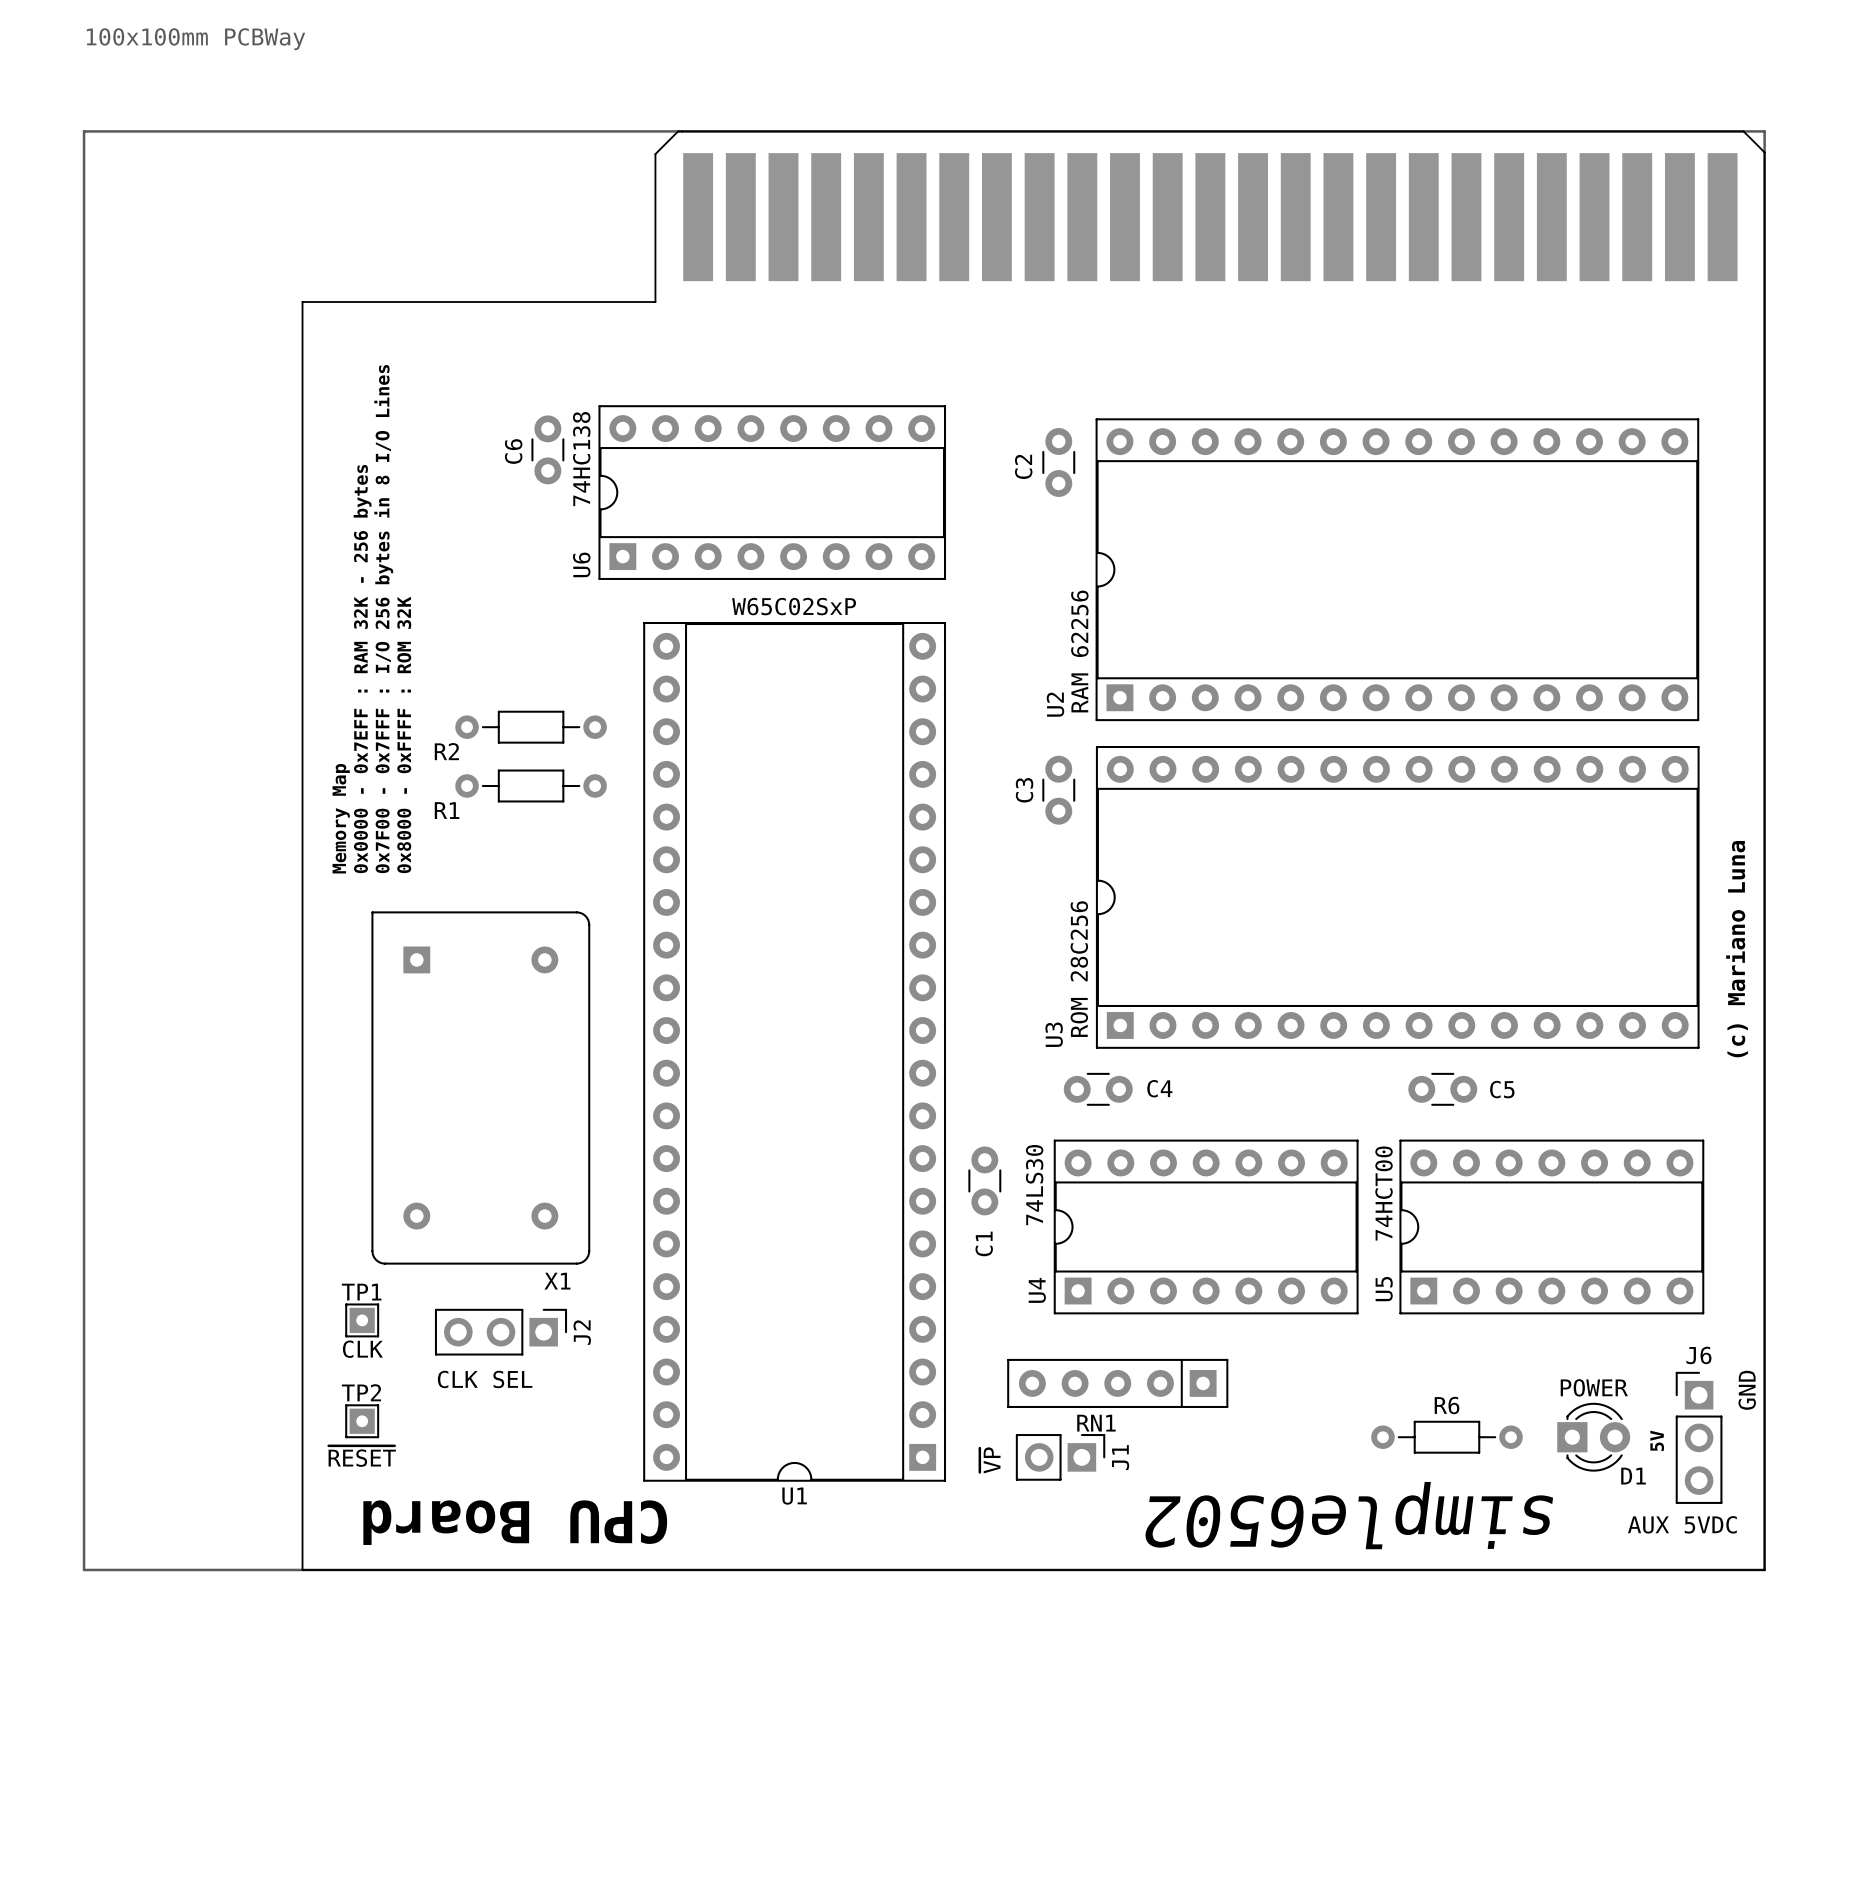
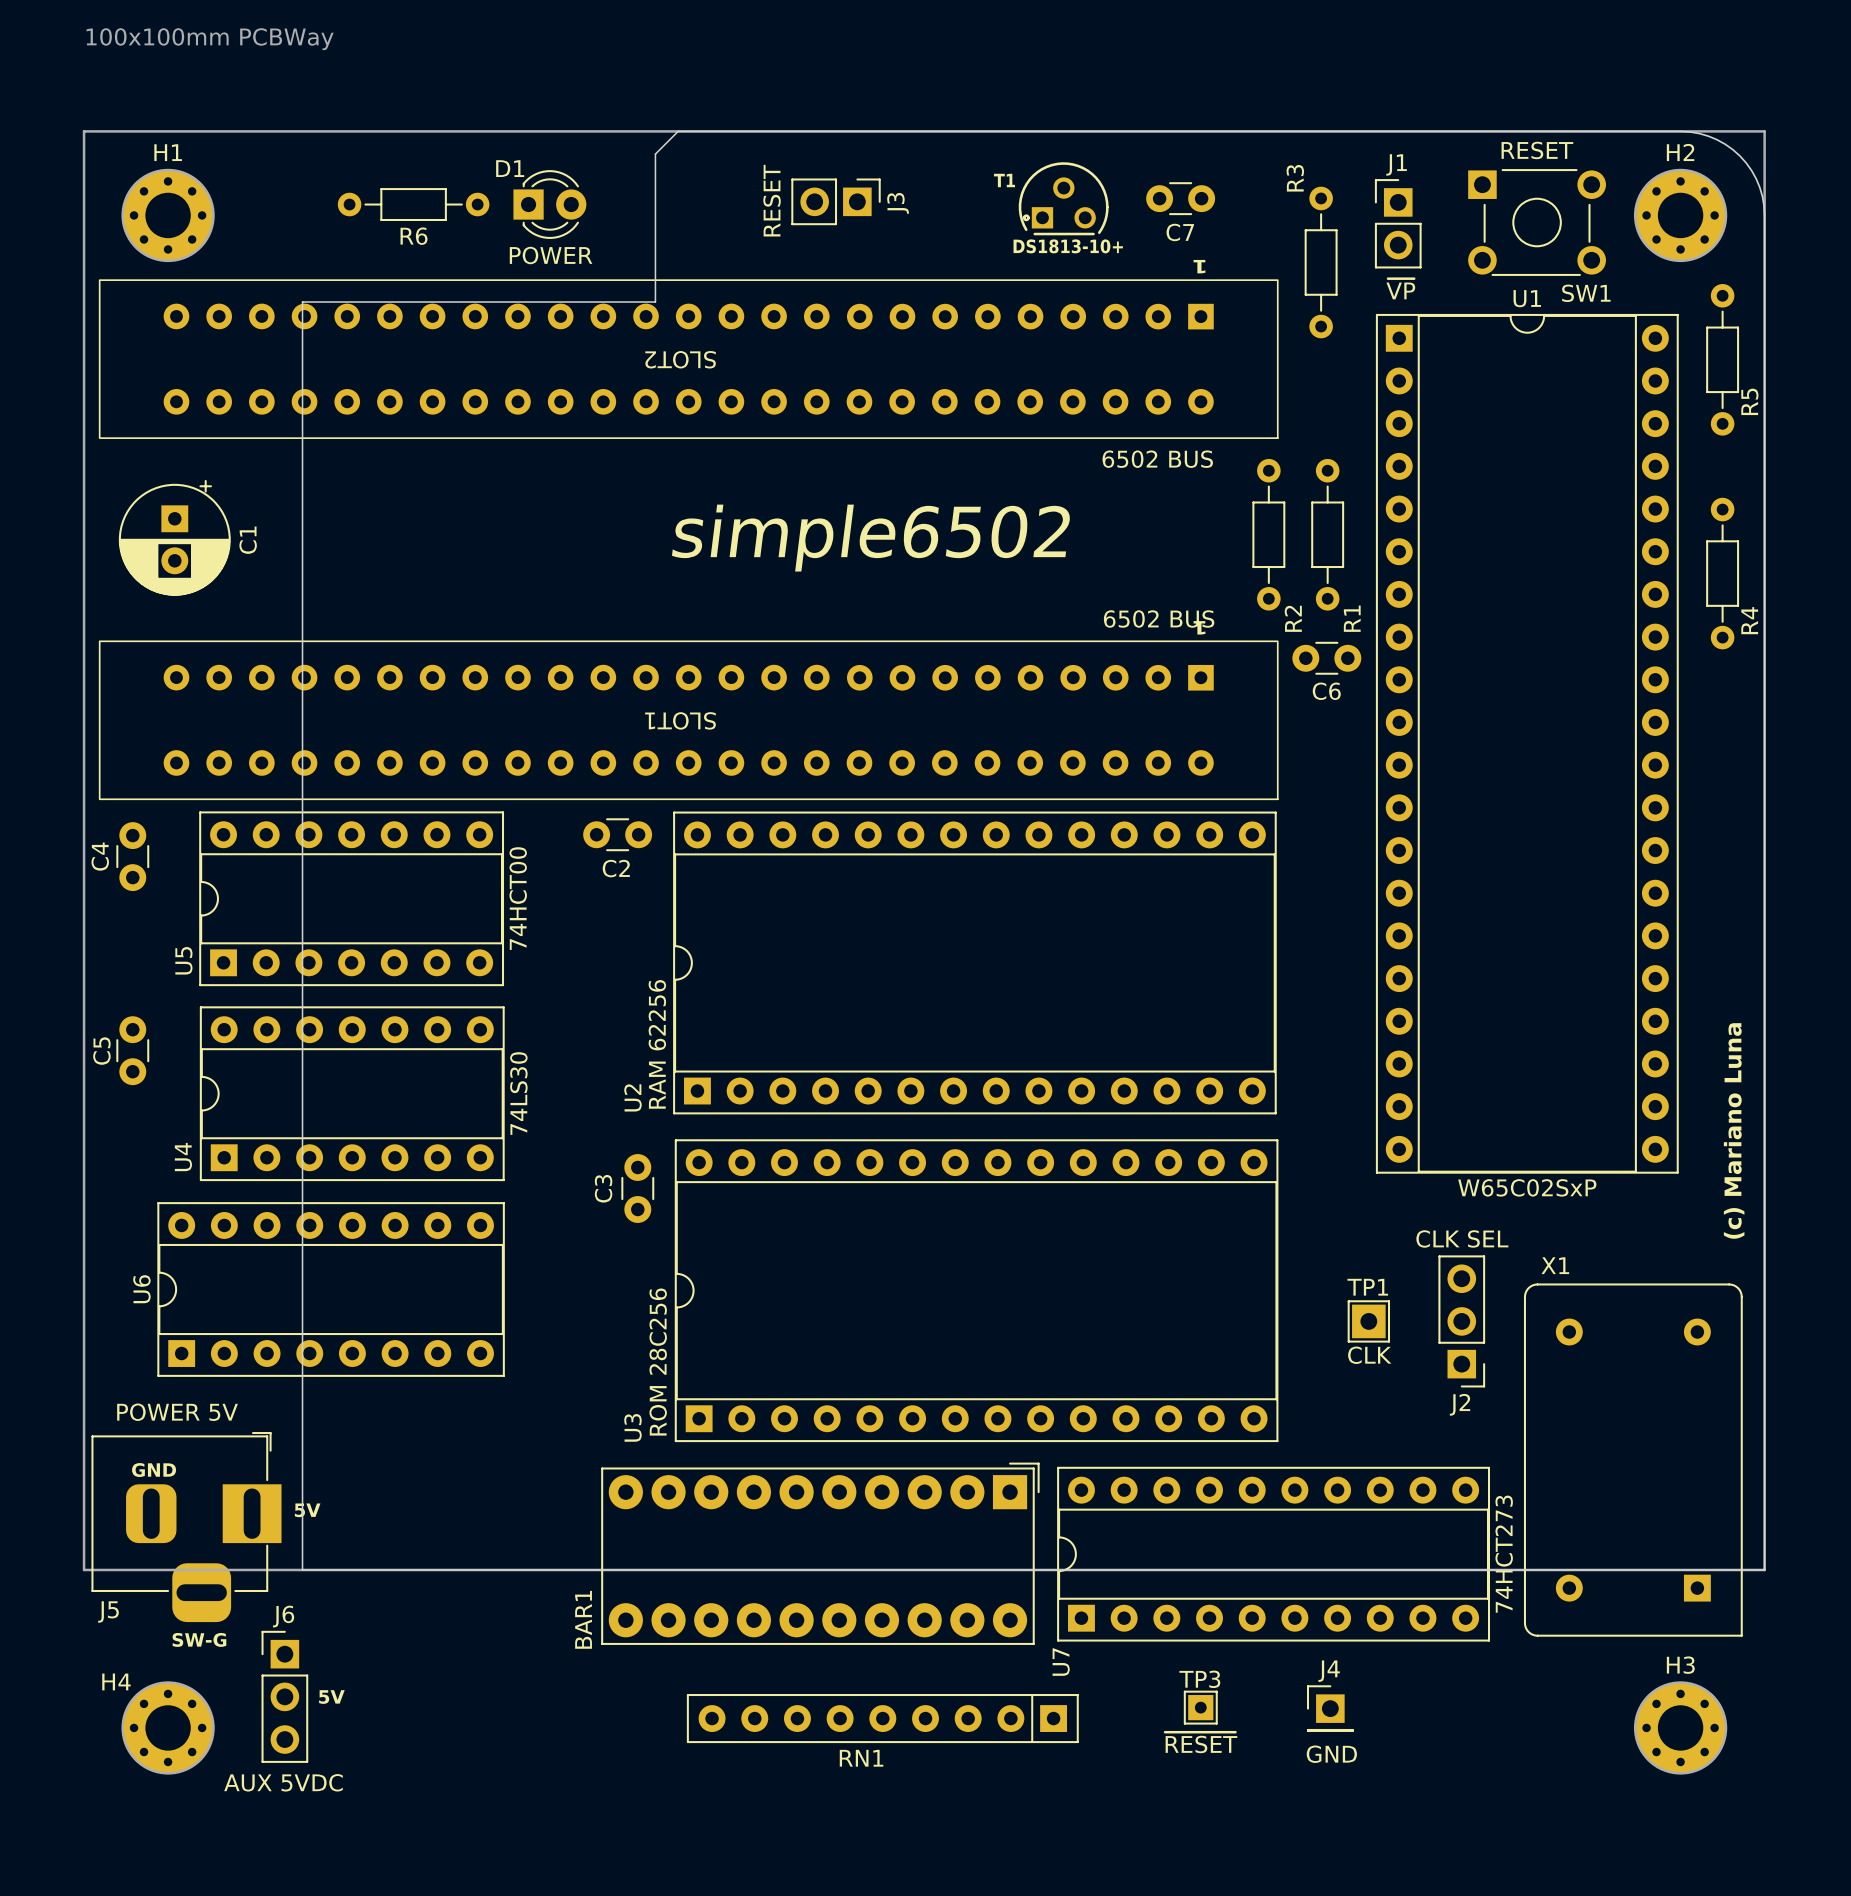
board edge: (1680, 131) (1743, 131) (1764, 152) (1764, 215) -> (1680, 131) (1699, 133) (1717, 139) (1740, 156) (1751, 170) (1759, 187) (1764, 215)
T1: none -> DS1813-10+ (1063, 198)
C7: none -> (1180, 198)
J3: none -> RESET (836, 201)
H1: none -> (168, 215)
H2: none -> (1680, 215)
part: (1210, 217) -> none
SW1: none -> RESET (1537, 222)
R3: none -> (1321, 262)
SLOT2: none -> 6502 BUS (688, 359)
R5: none -> (1722, 359)
C6 rotation: 0° (547, 449) -> 90° clockwise (1326, 658)
C6 position: (547, 449) -> (1326, 658)
C6 name position: C6 (513, 451) -> C6 (1326, 691)
U6 value: 74HC138 (581, 459) -> none
C2 rotation: 0° (1058, 462) -> 90° clockwise (617, 834)
C2 position: (1058, 462) -> (617, 834)
C2 name position: C2 (1023, 466) -> C2 (616, 868)
U6 position: (772, 492) -> (331, 1289)
text: none -> simple6502 (871, 538)
U6 name position: U6 (581, 564) -> U6 (141, 1289)
U2 position: (1397, 569) -> (974, 962)
R4: none -> (1722, 573)
text: 0x7F00 - 0x7FFF : I/O 256 bytes in 8 I/O Lines (383, 619) -> none
text: 0x0000 - 0x7EFF : RAM 32K - 256 bytes (362, 669) -> none
SLOT1: none -> 6502 BUS (688, 720)
R2 rotation: 0° (531, 727) -> 90° clockwise (1268, 534)
R2 position: (531, 727) -> (1268, 534)
text: 0x8000 - 0xFFFF : ROM 32K (404, 734) -> none
R2 name position: R2 (446, 751) -> R2 (1293, 618)
R1 rotation: 0° (531, 786) -> 90° clockwise (1327, 534)
R1 position: (531, 786) -> (1327, 534)
C3 position: (1058, 790) -> (637, 1188)
R1 name position: R1 (447, 810) -> R1 (1352, 618)
text: Memory Map (341, 818) -> none
U3 position: (1397, 897) -> (976, 1290)
text position: (c) Mariano Luna (1737, 949) -> (c) Mariano Luna (1734, 1130)
U1 rotation: 0° (794, 1051) -> 180° (1527, 743)
U1 position: (794, 1051) -> (1527, 743)
X1 rotation: 0° (480, 1088) -> 180° (1633, 1460)
X1 position: (480, 1088) -> (1633, 1460)
C4 name position: C4 (1159, 1088) -> C4 (100, 856)
C4 rotation: 0° (1098, 1089) -> 90° clockwise (132, 856)
C4 position: (1098, 1089) -> (132, 856)
C5 rotation: 0° (1442, 1089) -> 90° clockwise (132, 1050)
C5 position: (1442, 1089) -> (132, 1050)
C5 name position: C5 (1502, 1089) -> C5 (101, 1051)
C1 footprint: [968, 1146, 1002, 1216] -> [118, 479, 231, 596]
U4 value position: 74LS30 (1034, 1185) -> 74LS30 (518, 1093)
U5 value position: 74HCT00 (1384, 1193) -> 74HCT00 (518, 898)
U4 position: (1206, 1226) -> (352, 1093)
U5 position: (1551, 1226) -> (351, 898)
C1 name position: C1 (984, 1243) -> C1 (248, 540)
TP1 footprint: [345, 1303, 380, 1338] -> [1347, 1300, 1391, 1343]
J2 rotation: 0° (501, 1332) -> 90° clockwise (1461, 1321)
J2 position: (501, 1332) -> (1461, 1321)
RN1 footprint: [1007, 1358, 1229, 1408] -> [686, 1694, 1079, 1744]
J2 value position: CLK SEL (485, 1379) -> CLK SEL (1462, 1238)
D1 value position: POWER (1594, 1387) -> POWER (551, 255)
text: GND (1747, 1390) -> none
R6 name position: R6 (1447, 1405) -> R6 (414, 236)
TP2: ~{RESET} (362, 1421) -> none
R6 position: (1446, 1437) -> (413, 204)
D1 position: (1593, 1437) -> (549, 204)
J6 position: (1699, 1437) -> (284, 1696)
text: 5V (1657, 1440) -> none
J1 rotation: 0° (1060, 1457) -> 90° counterclockwise (1398, 223)
J1 position: (1060, 1457) -> (1398, 223)
text: none -> GND (154, 1470)
D1 name position: D1 (1633, 1476) -> D1 (510, 168)
text: none -> 5V (307, 1510)
text: simple6502 (1348, 1515) -> none
text: CPU Board (515, 1522) -> none
J6 value position: AUX 5VDC (1682, 1524) -> AUX 5VDC (283, 1782)
J5: none -> POWER 5V (186, 1527)
BAR1: none -> (820, 1553)
U7: none -> 74HCT273 (1273, 1554)
text: none -> SW-G (199, 1639)
text: none -> 5V (331, 1697)
TP3: none -> ~{RESET} (1200, 1707)
J4: none -> (1330, 1708)
H4: none -> (168, 1727)
H3: none -> (1680, 1727)
text: none -> GND (1331, 1754)

